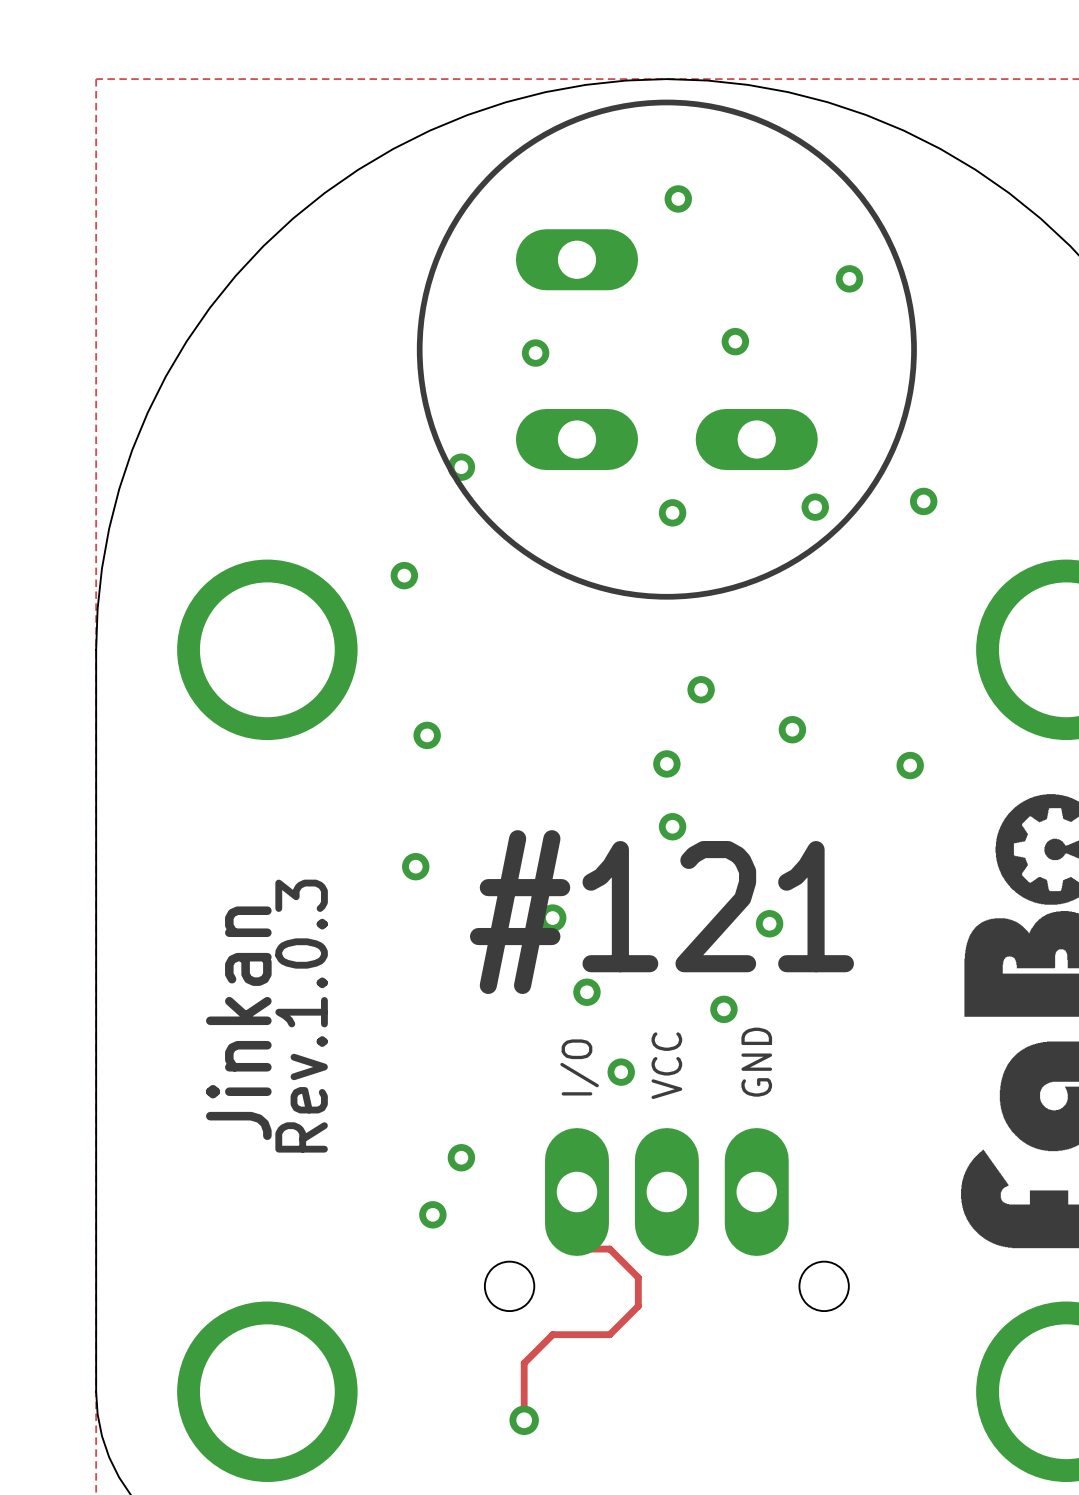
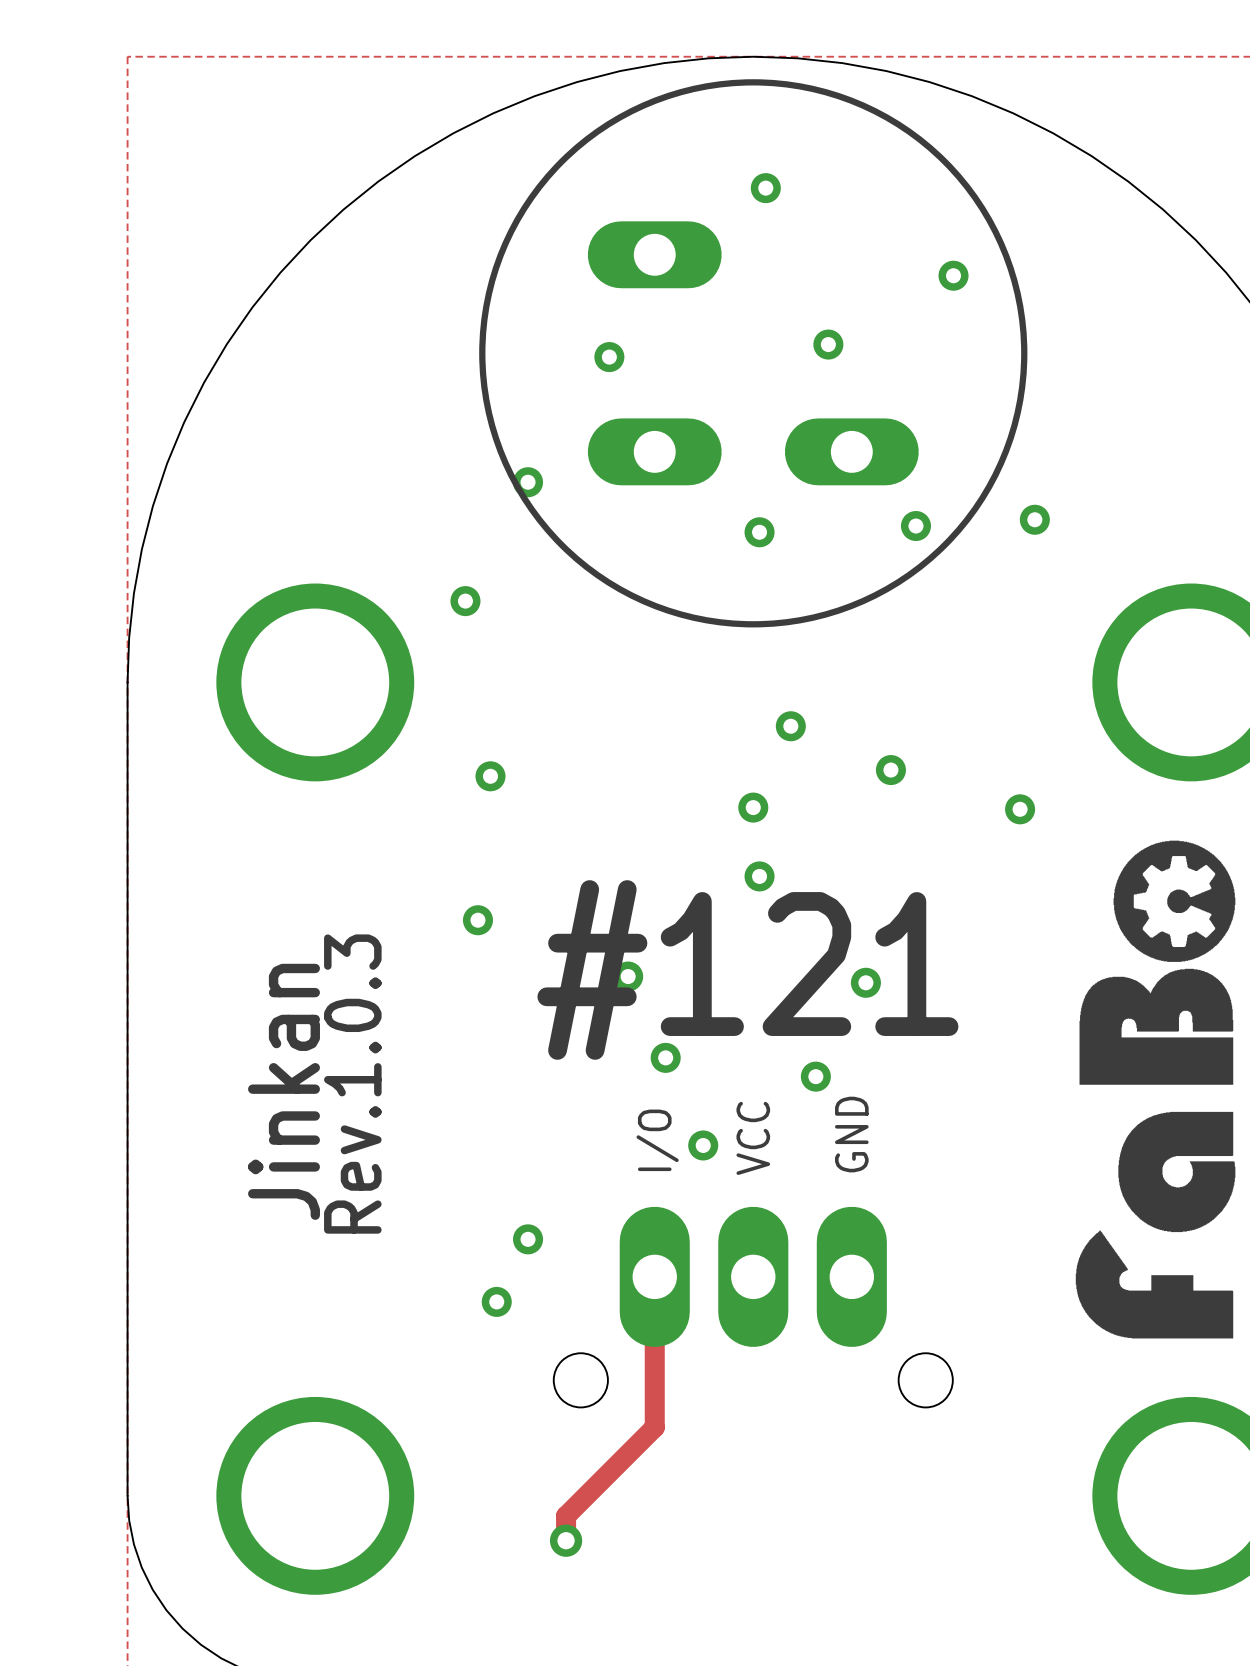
track: (576, 1244) (581, 1249) (609, 1249) (638, 1277) (638, 1306) (609, 1334) (552, 1334) (524, 1363) (524, 1420) -> (654, 1334) (654, 1427) (566, 1516) (566, 1540)
via position: (524, 1420) -> (566, 1540)

